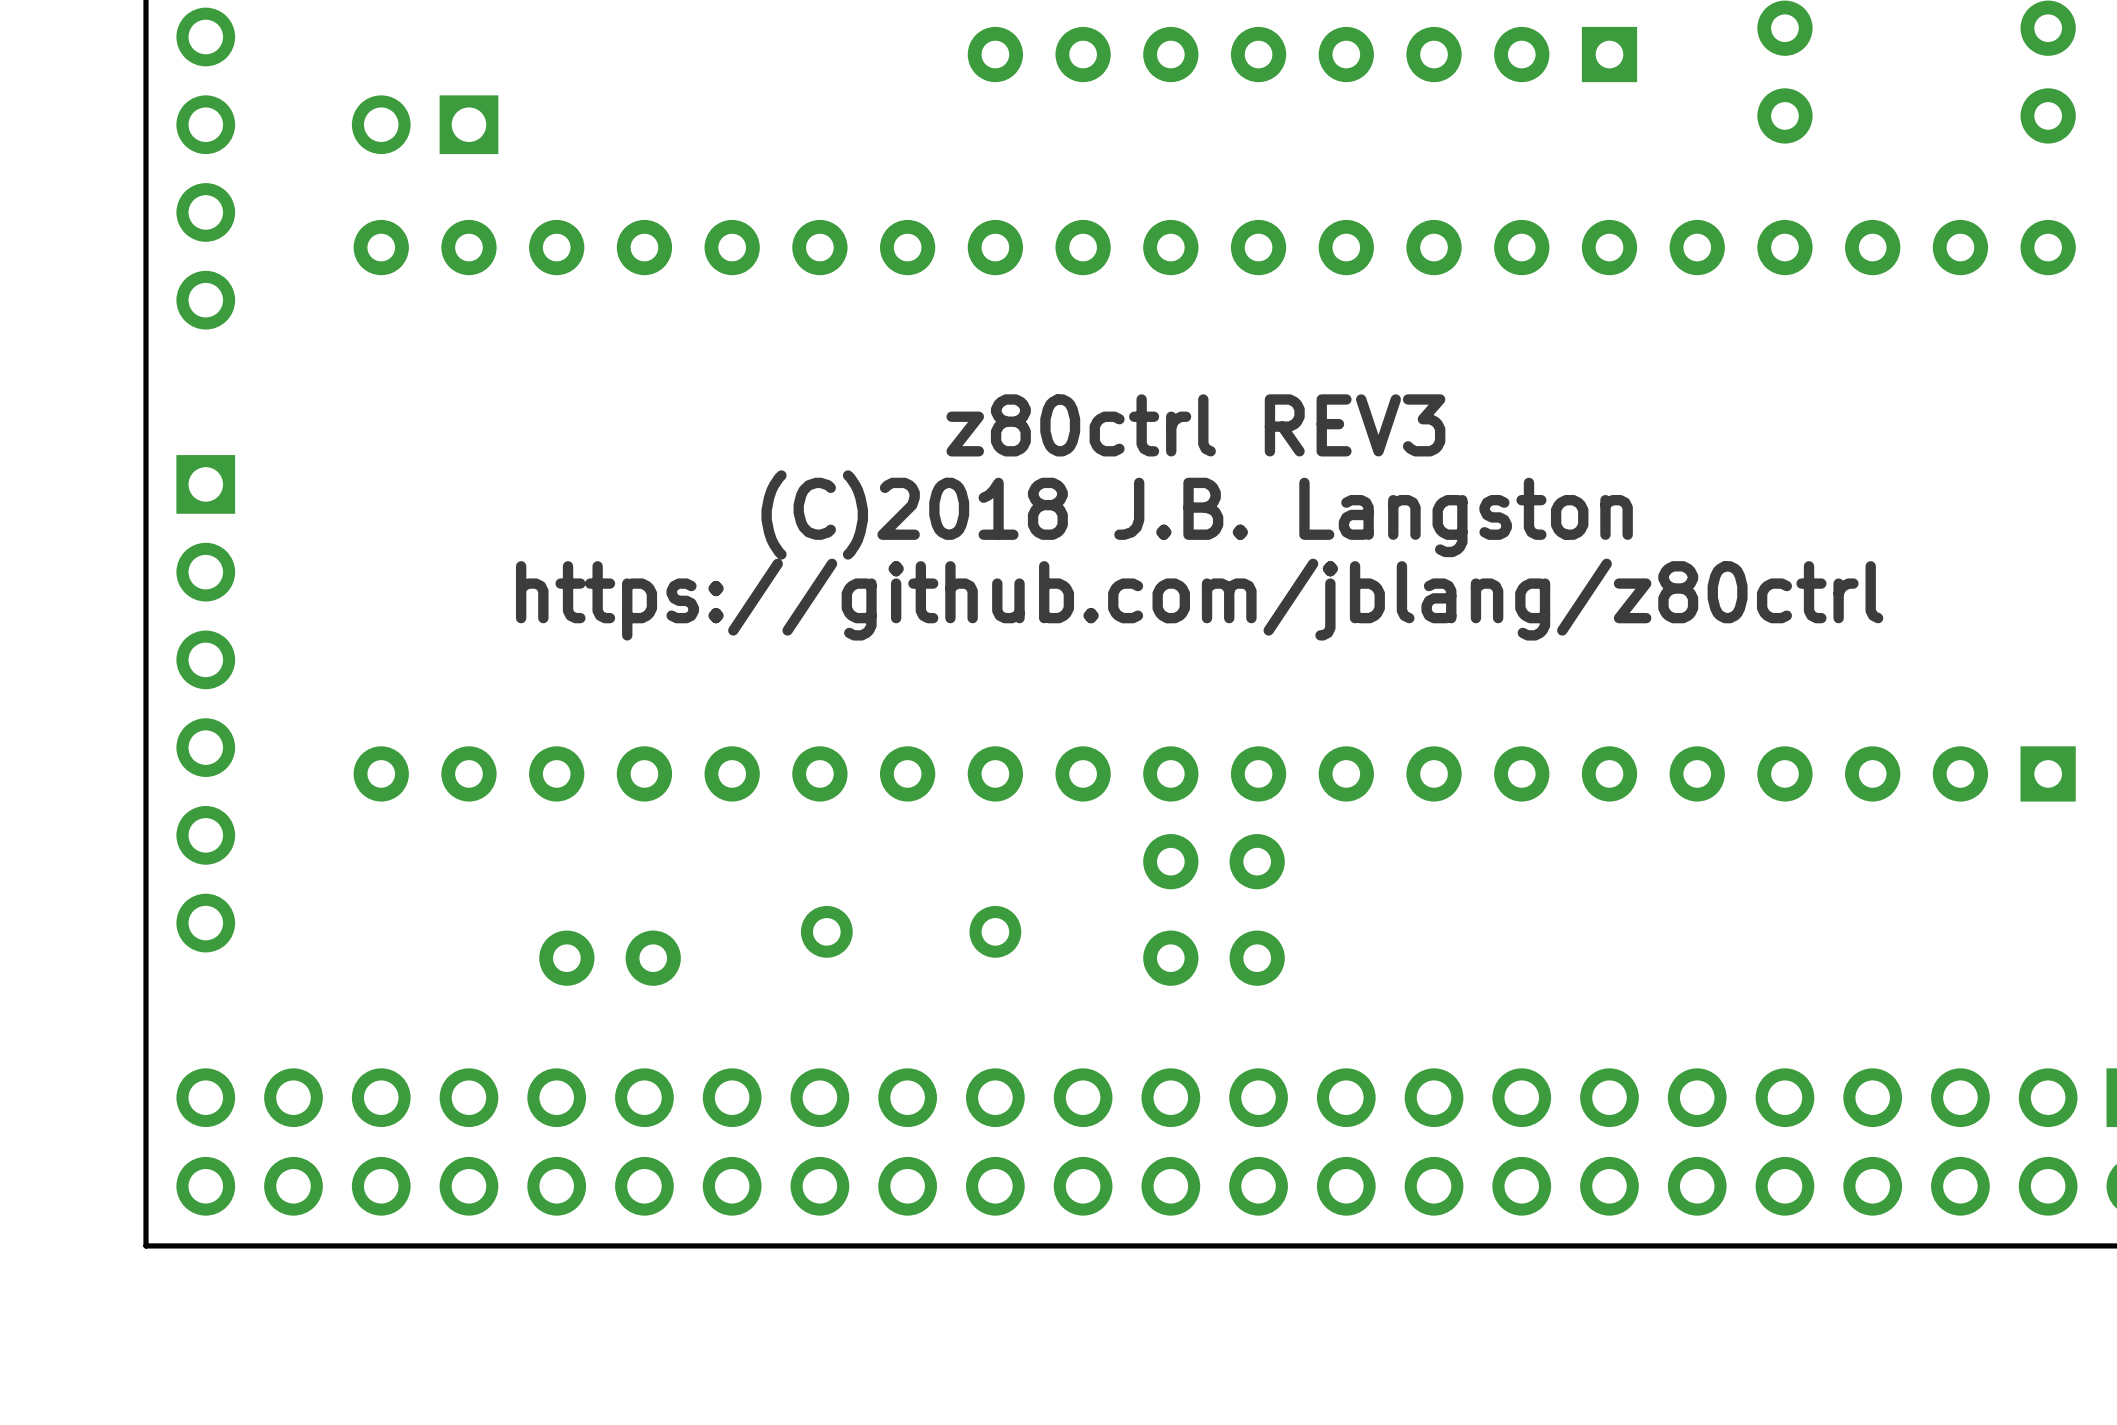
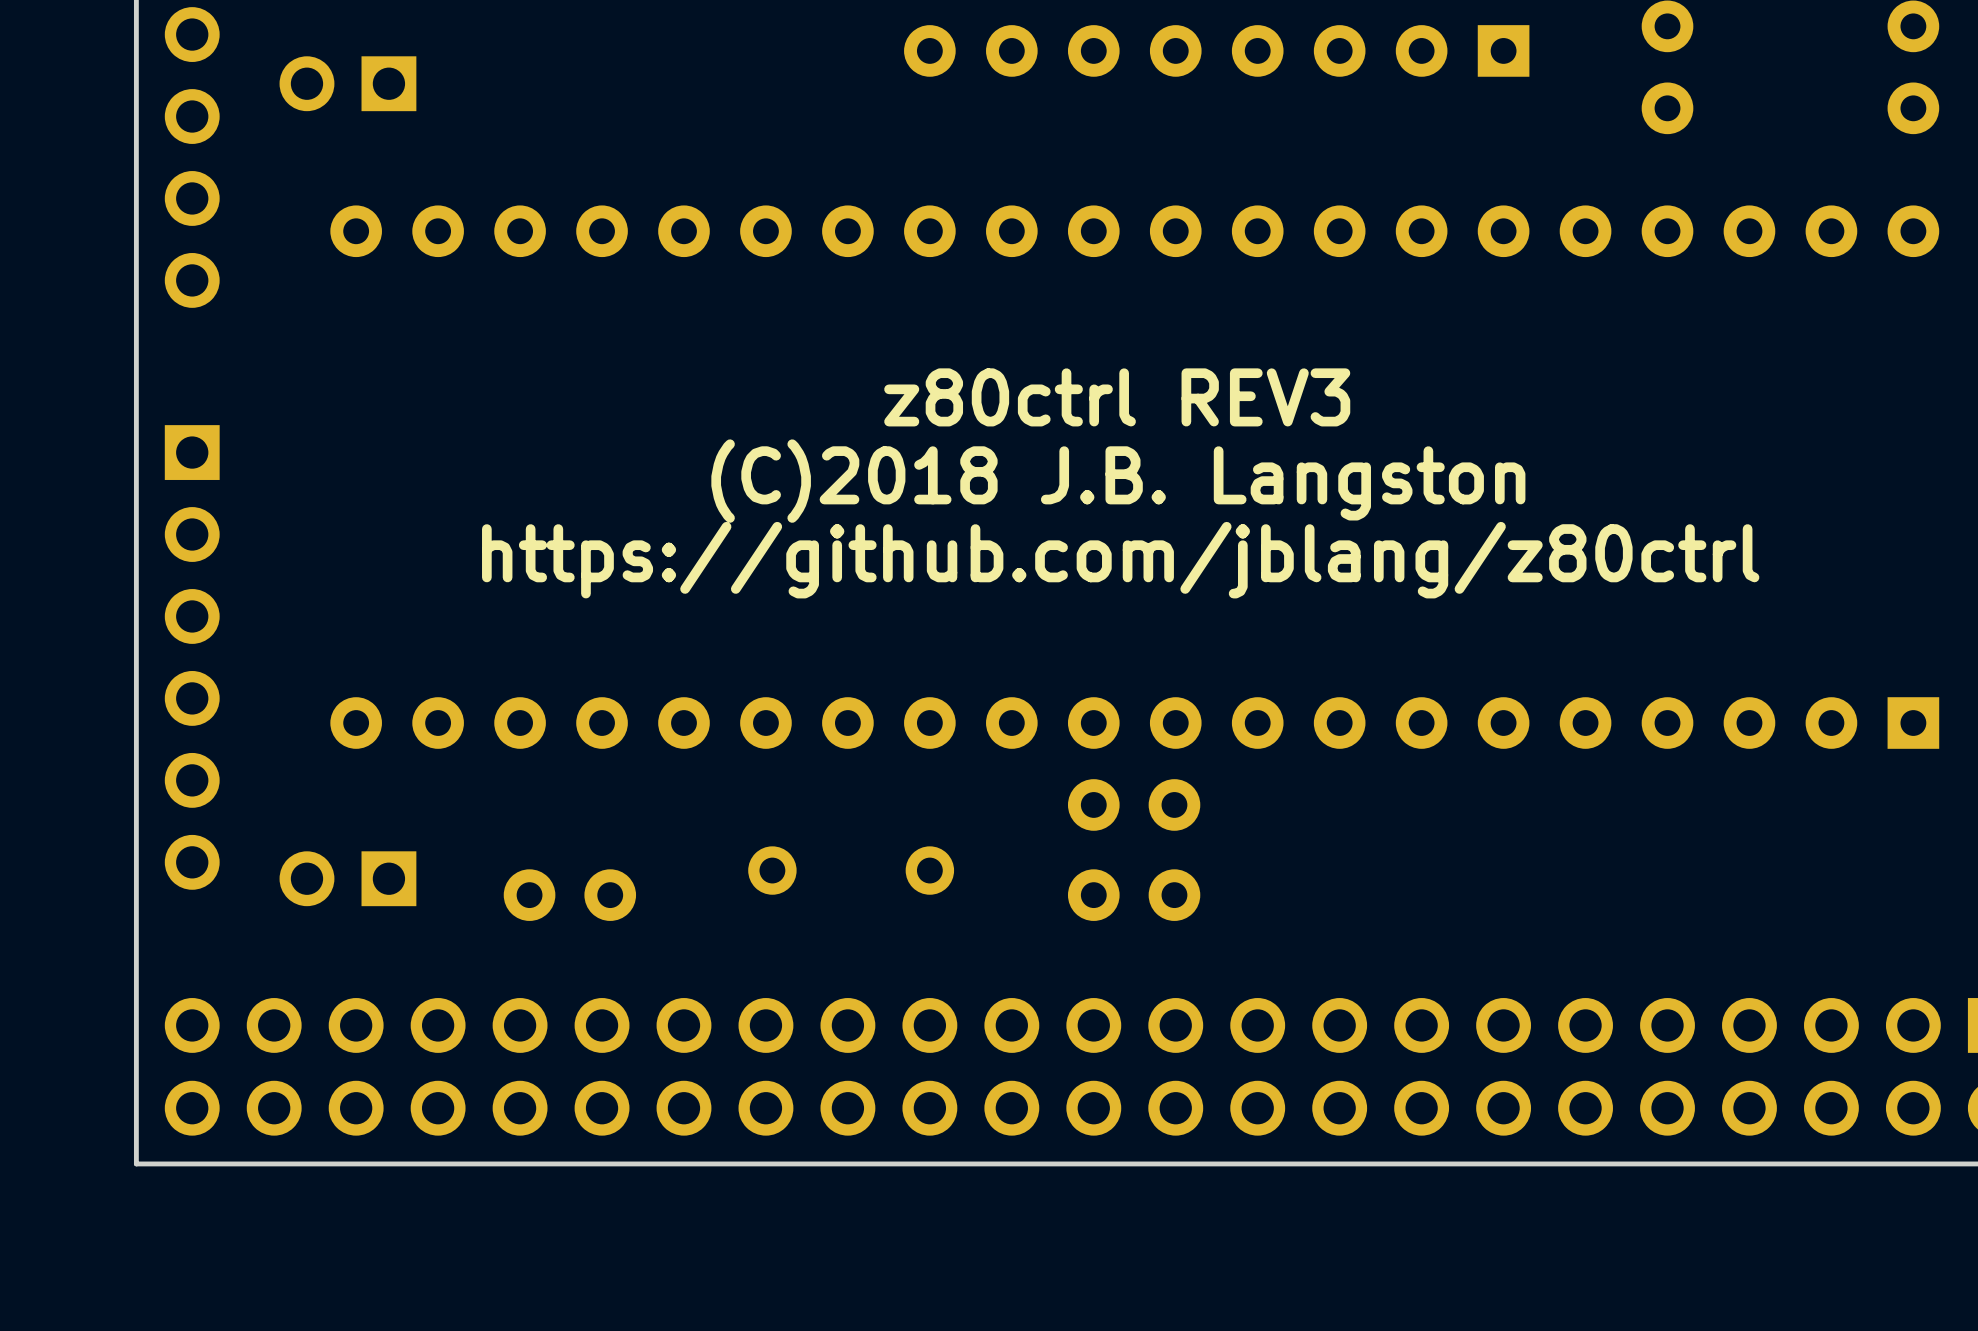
part position: (425, 124) -> (347, 83)
part: none -> (347, 878)

